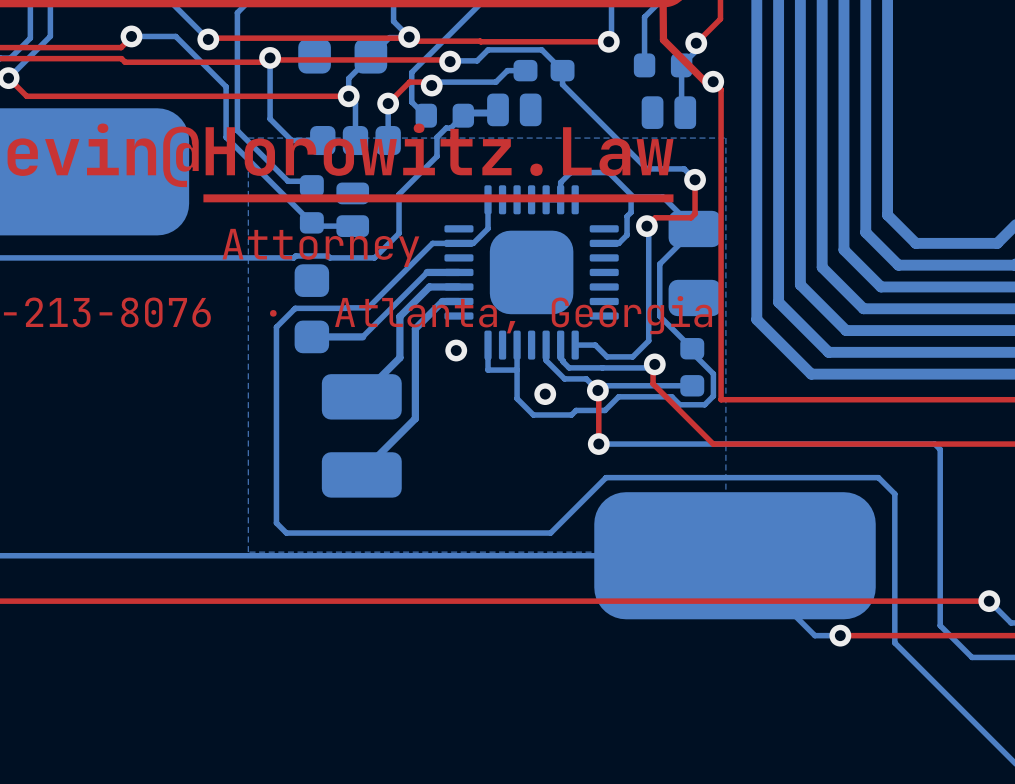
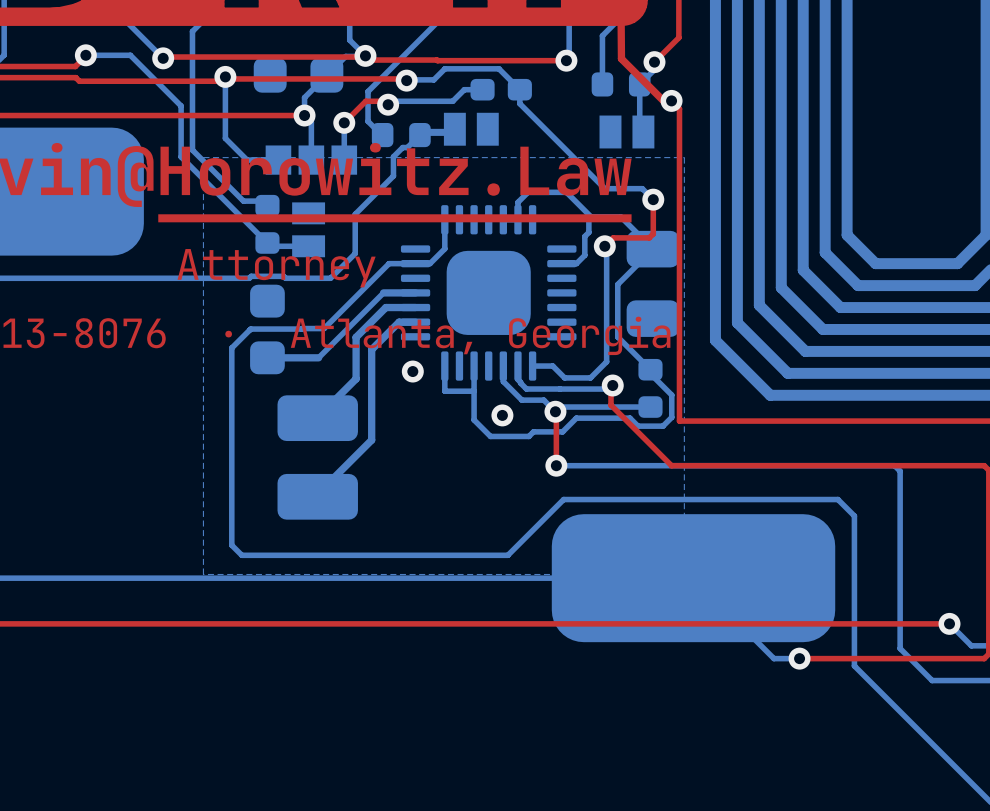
part footprint: [487, 93, 542, 127] -> [443, 112, 499, 146]
part footprint: [641, 96, 697, 129] -> [599, 115, 655, 149]
part footprint: [310, 126, 401, 156] -> [265, 145, 358, 175]
part footprint: [336, 182, 370, 238] -> [292, 202, 326, 258]

